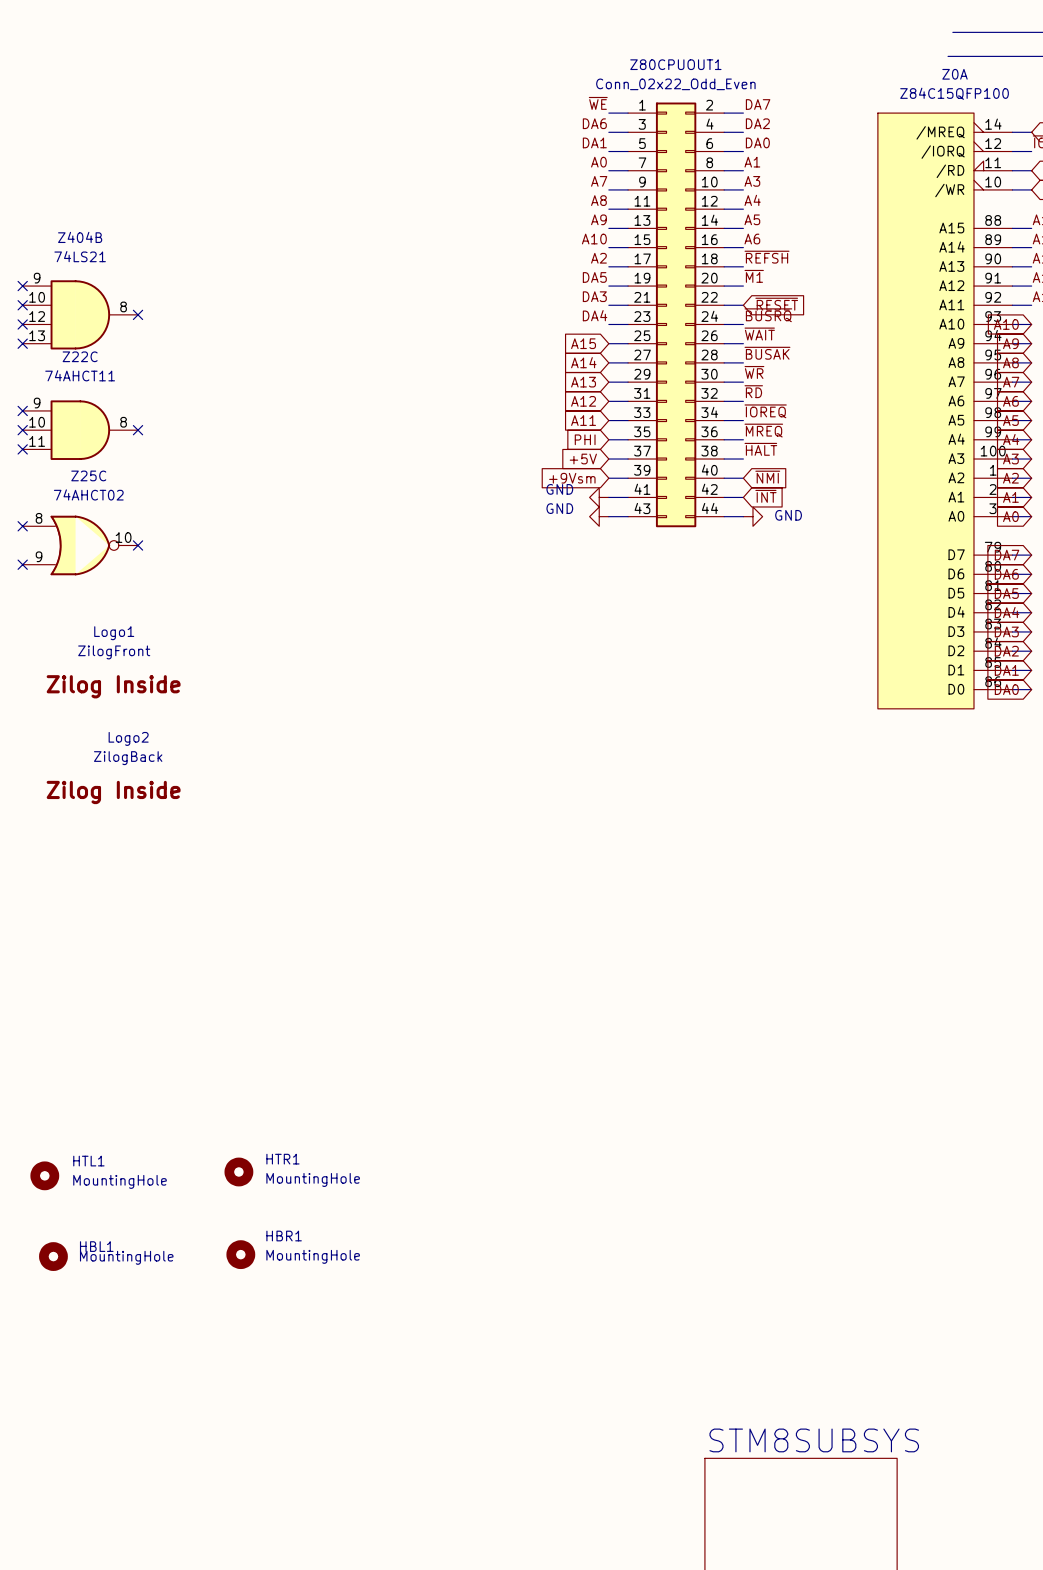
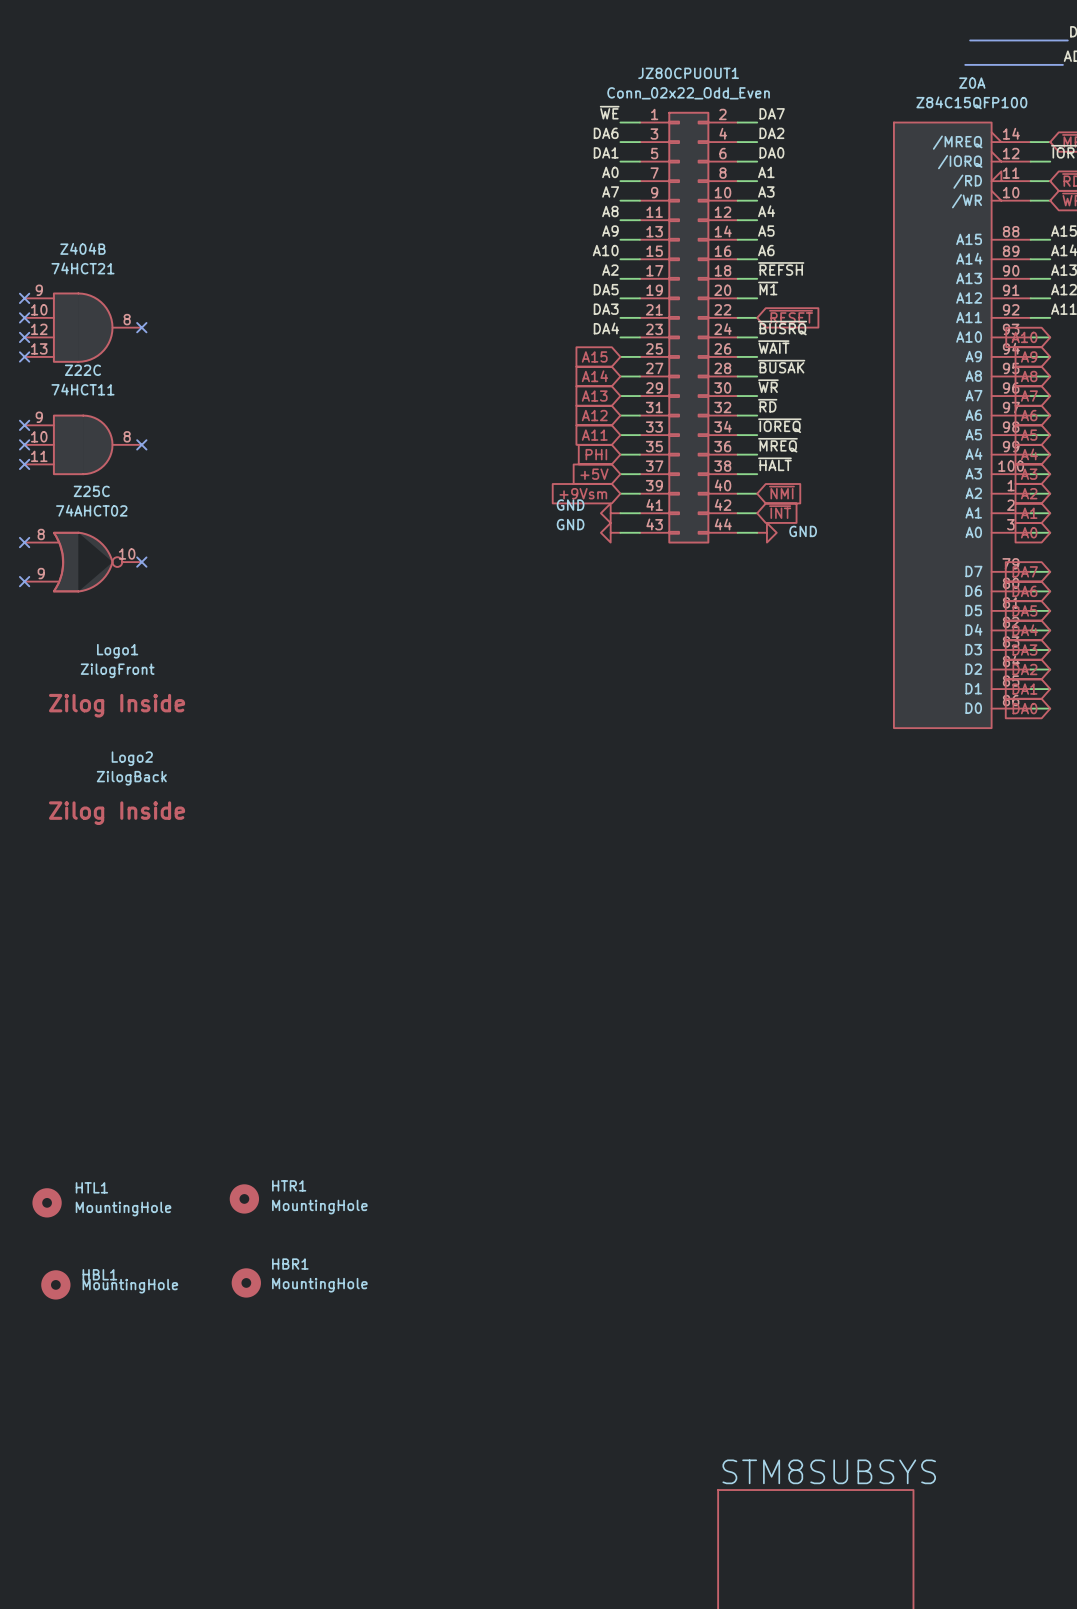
Z80CPUOUT1 name: Z80CPUOUT1 (675, 64) -> JZ80CPUOUT1 (688, 73)
Z404B value: 74LS21 (80, 256) -> 74HCT21 (82, 268)
Z22C value: 74AHCT11 (80, 375) -> 74HCT11 (82, 389)

